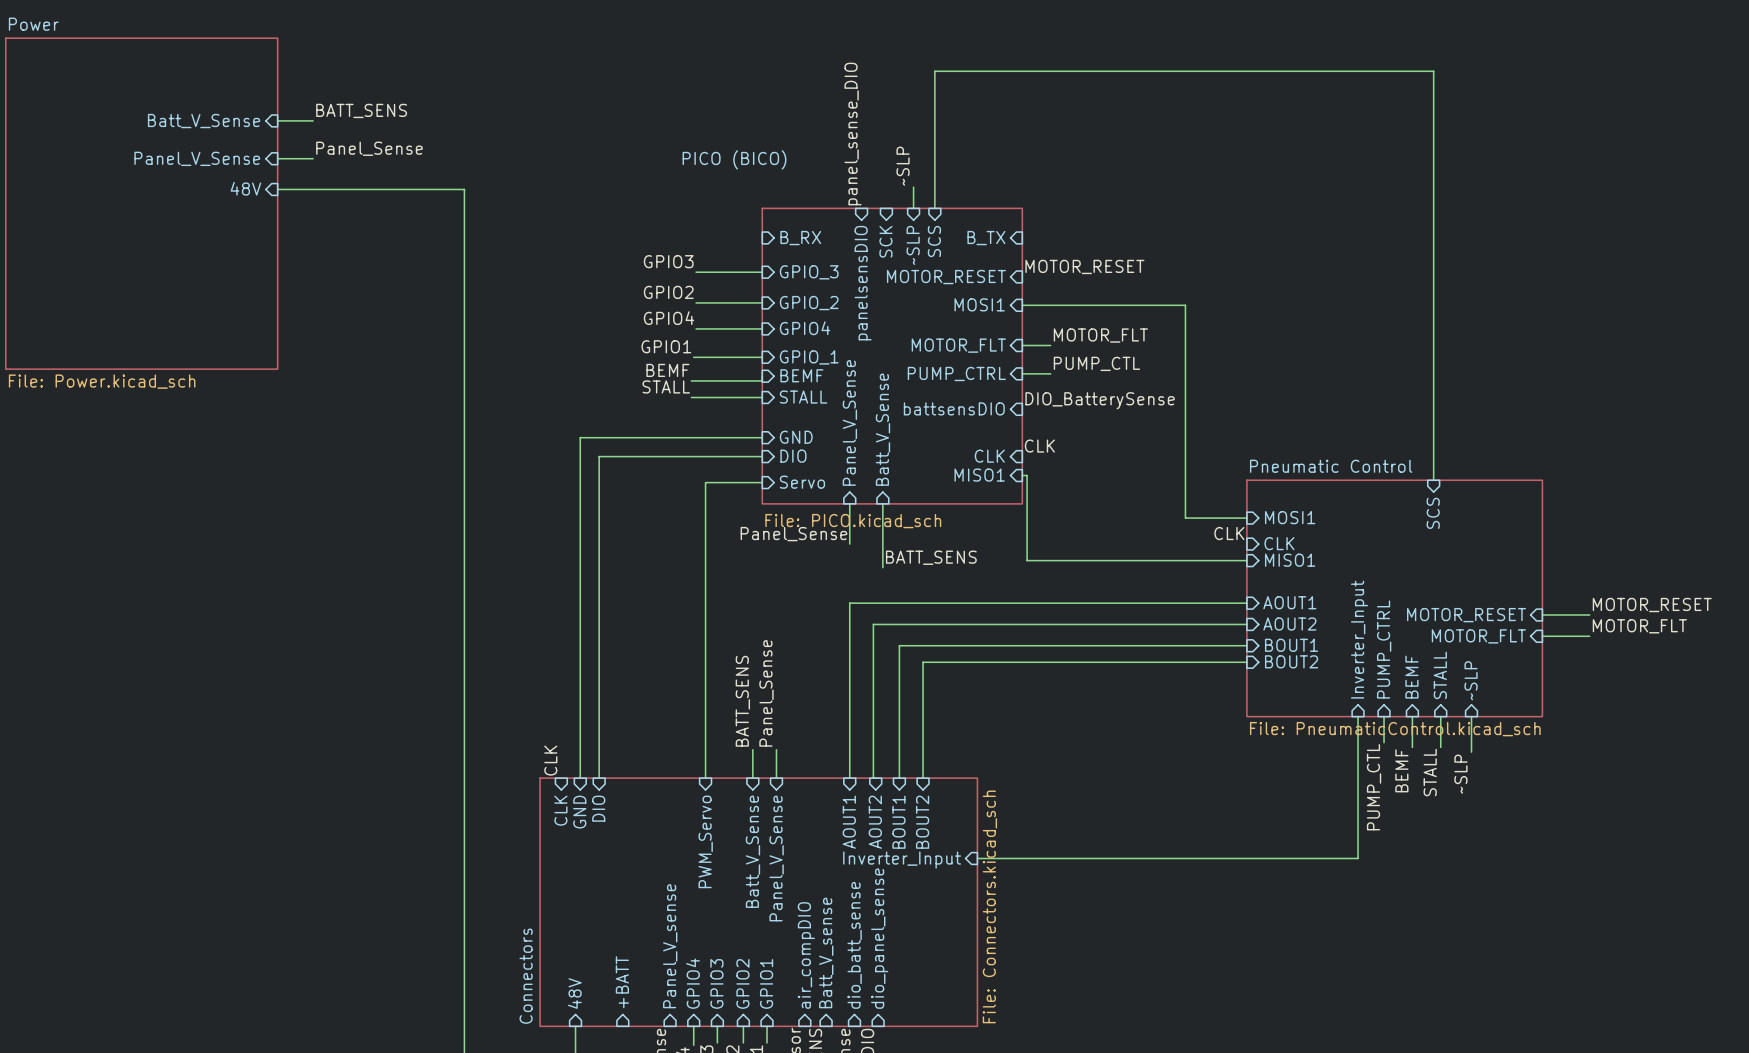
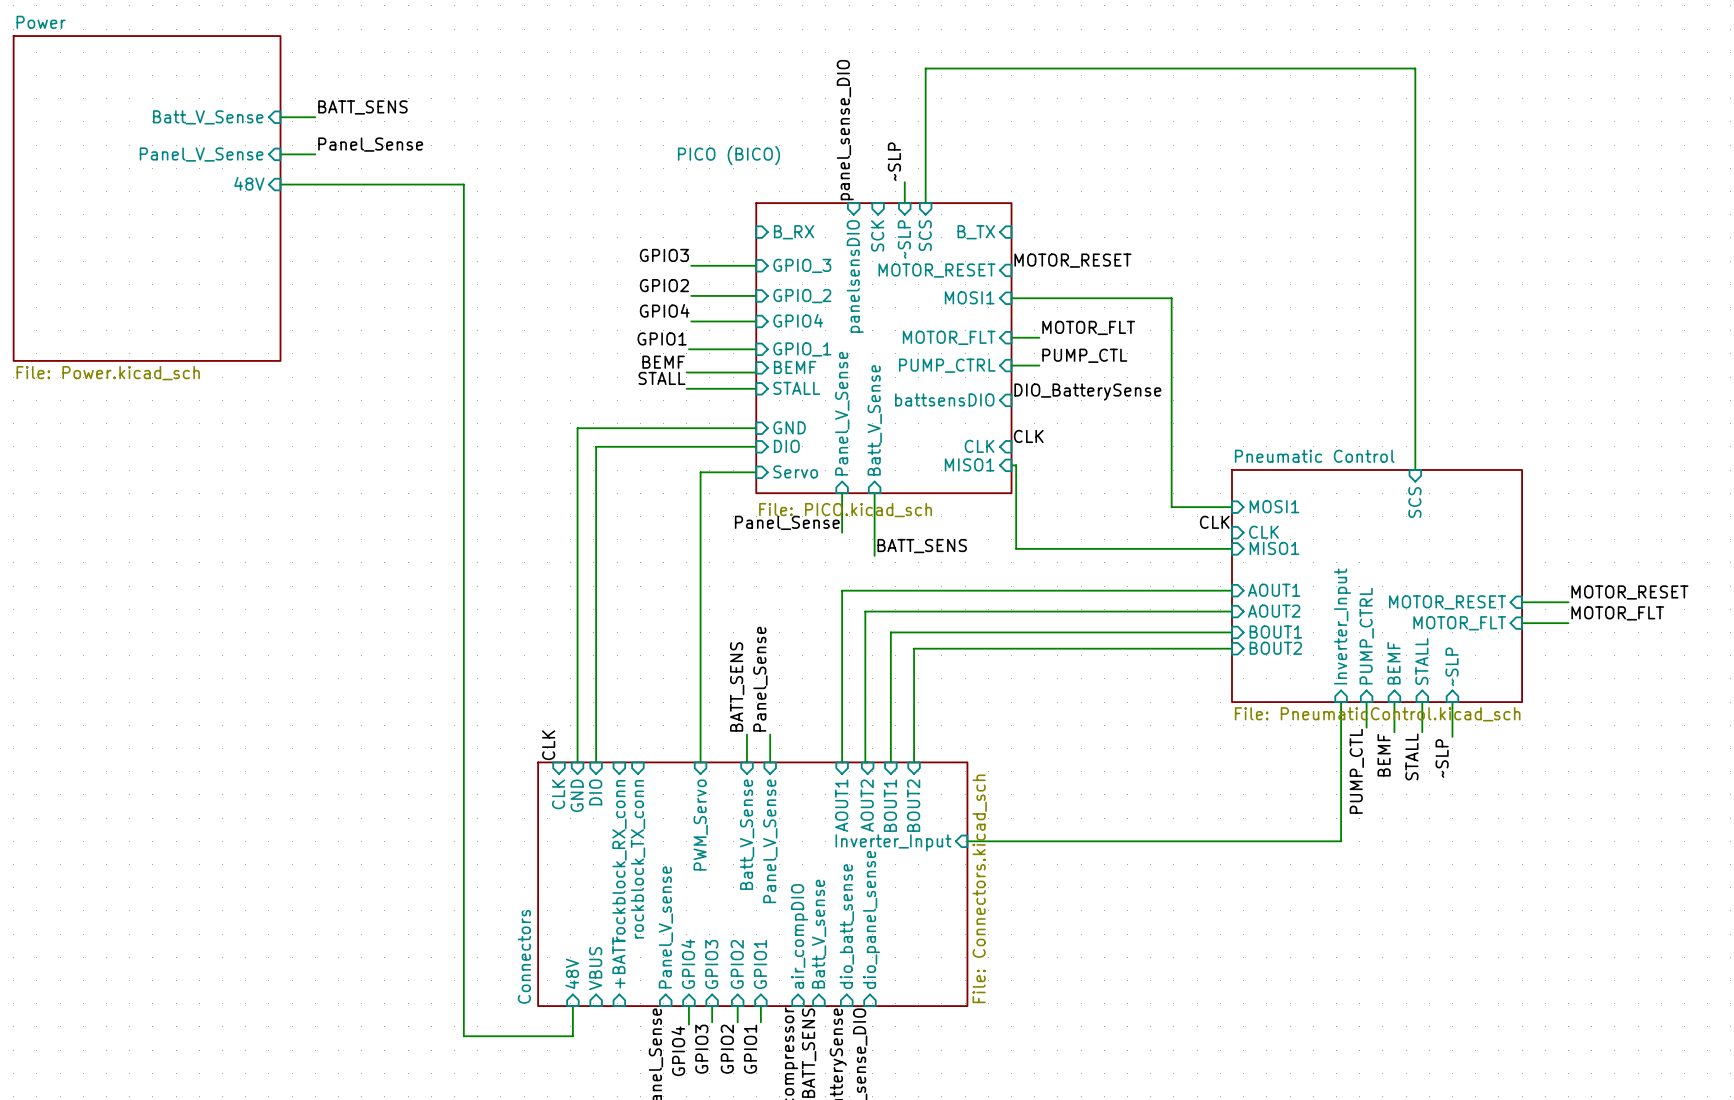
sheet pin: none -> rockblock_TX_conn (638, 859)
sheet pin: none -> rockblock_RX_conn (619, 860)
sheet pin: none -> VBUS (595, 968)

